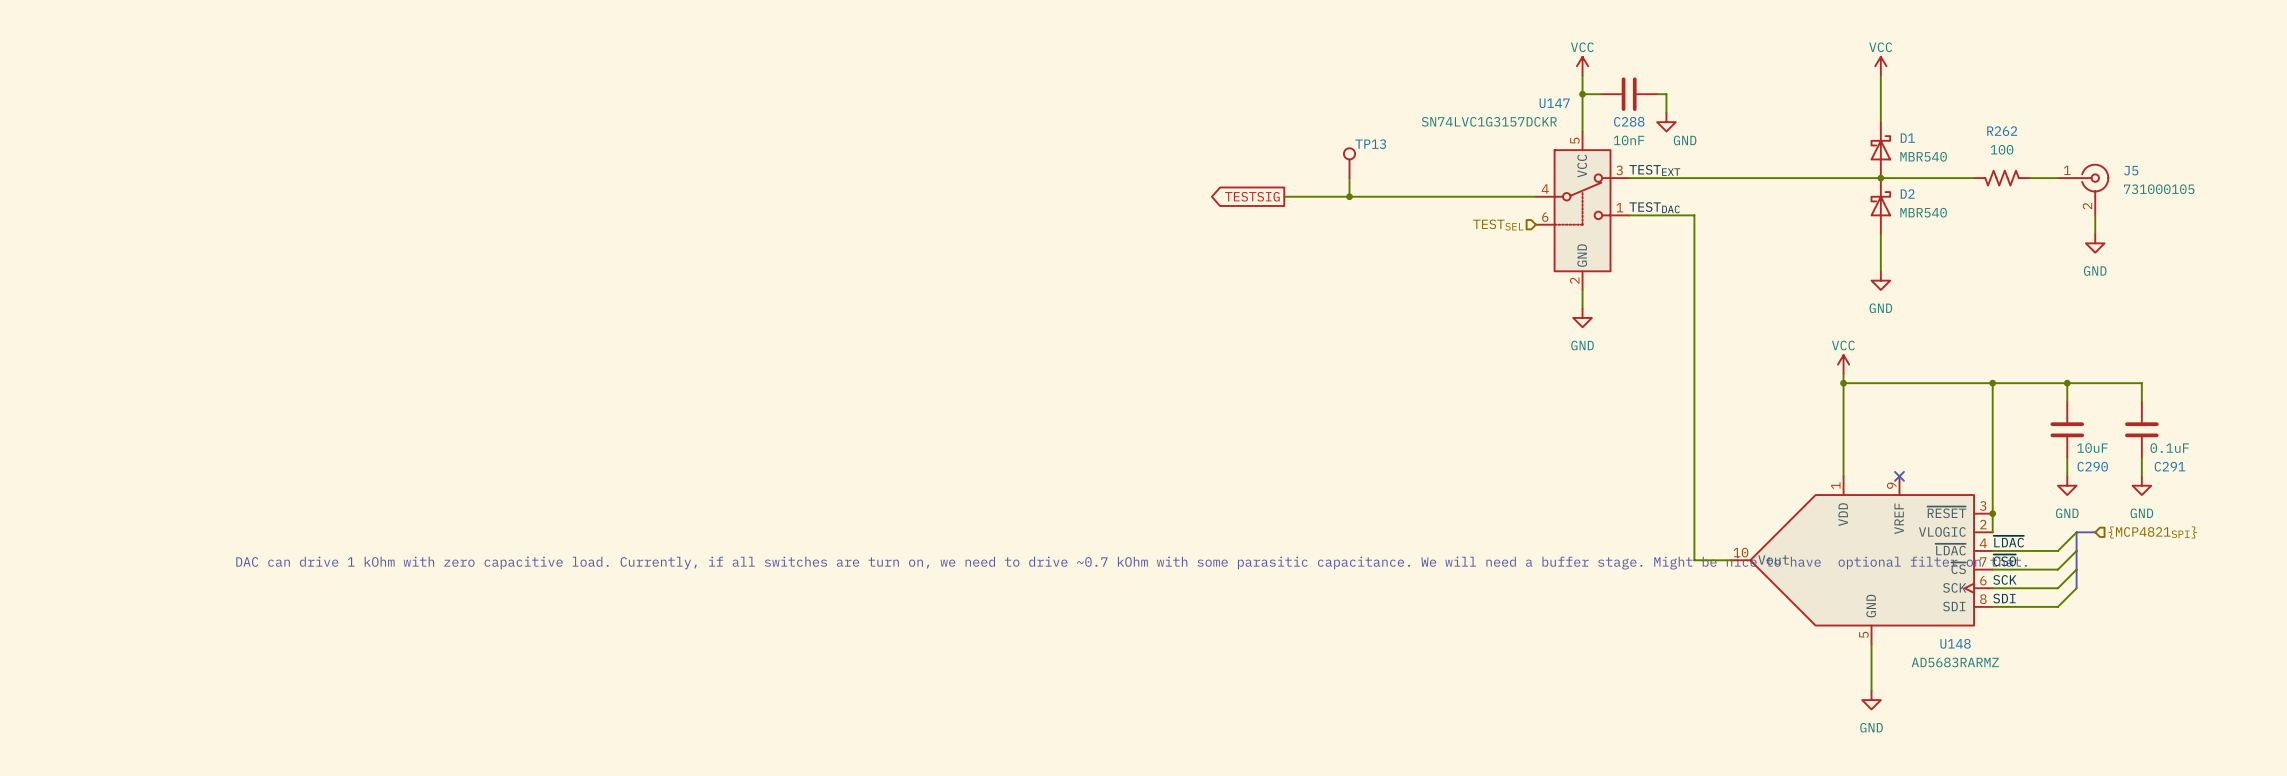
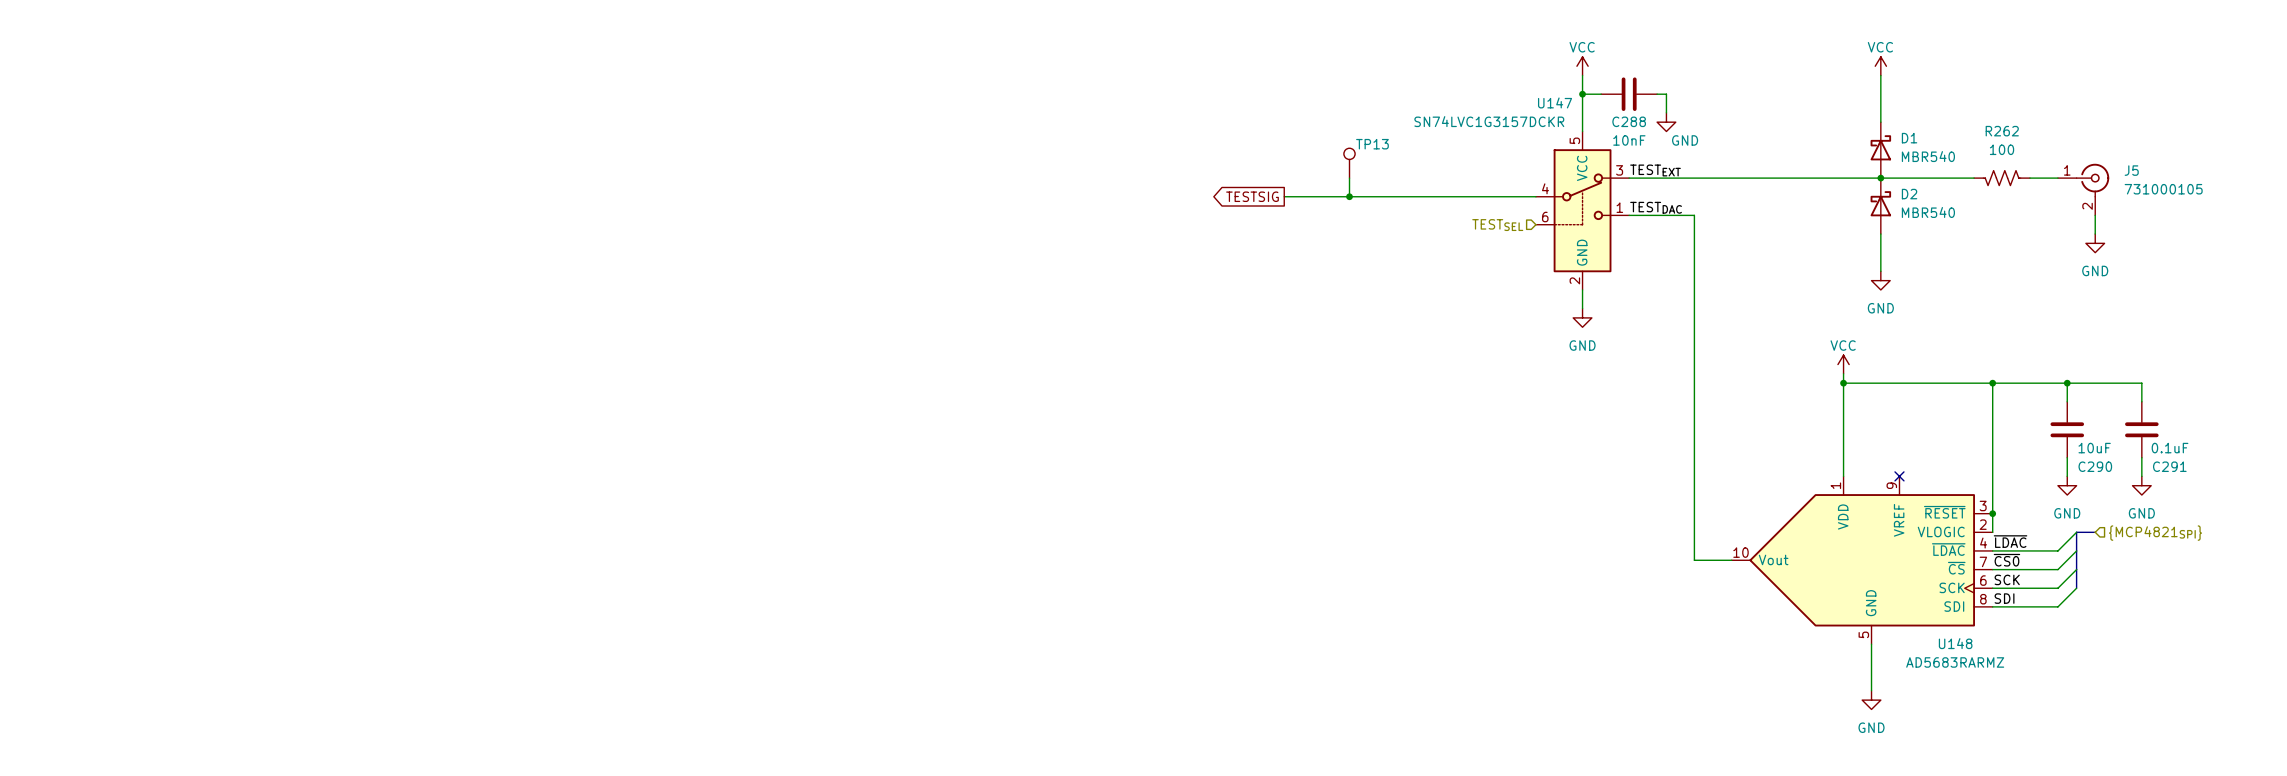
text: DAC can drive 1 kOhm with zero capacitive load. Currently, if all switches are turn on, we need to drive ~0.7 kOhm with some parasitic capacitance. We will need a buffer stage. Might be nice to have optional filter on that. (1131, 563) -> none

